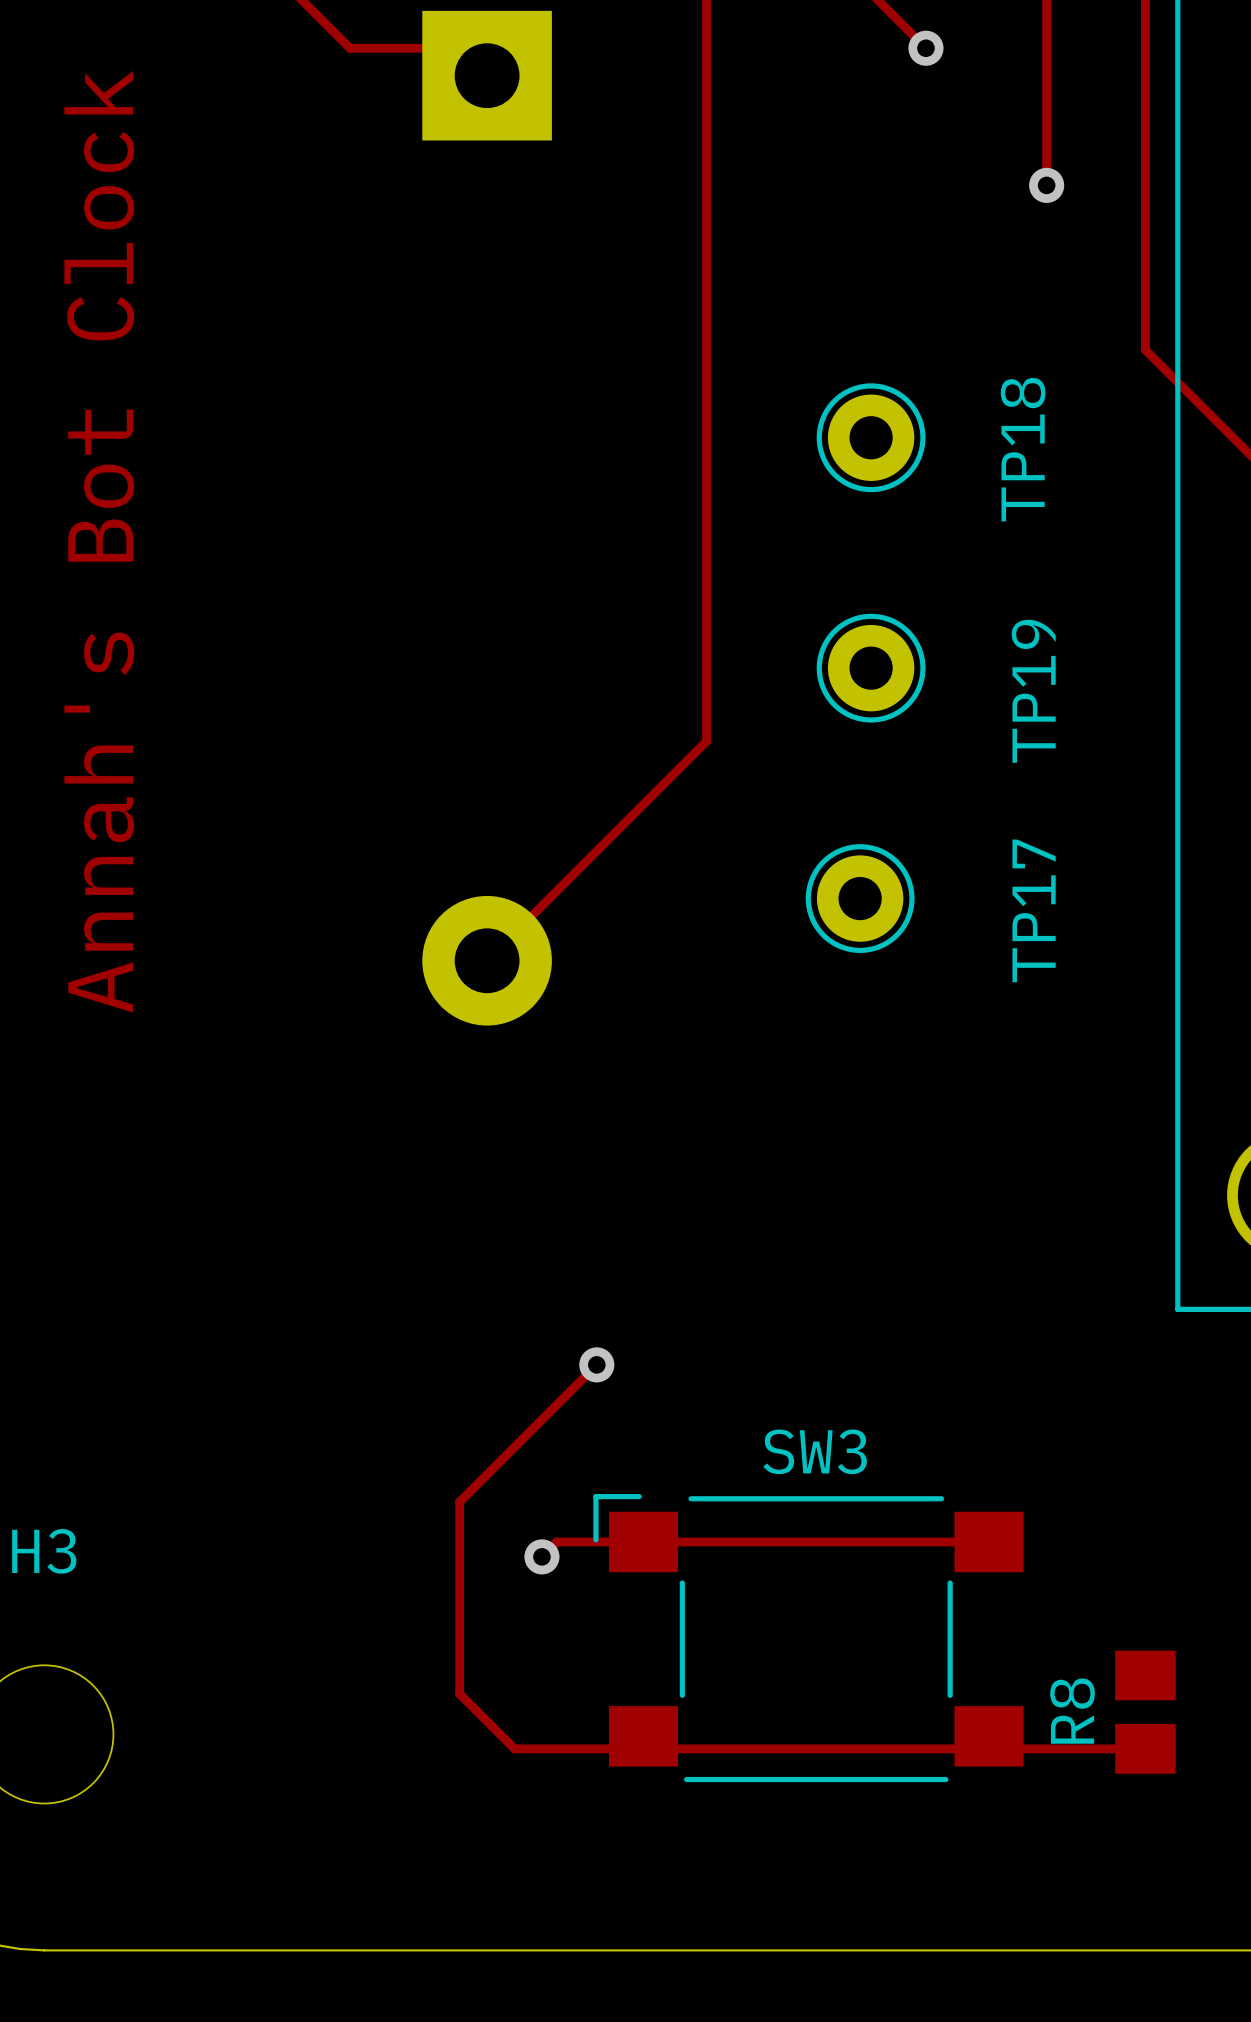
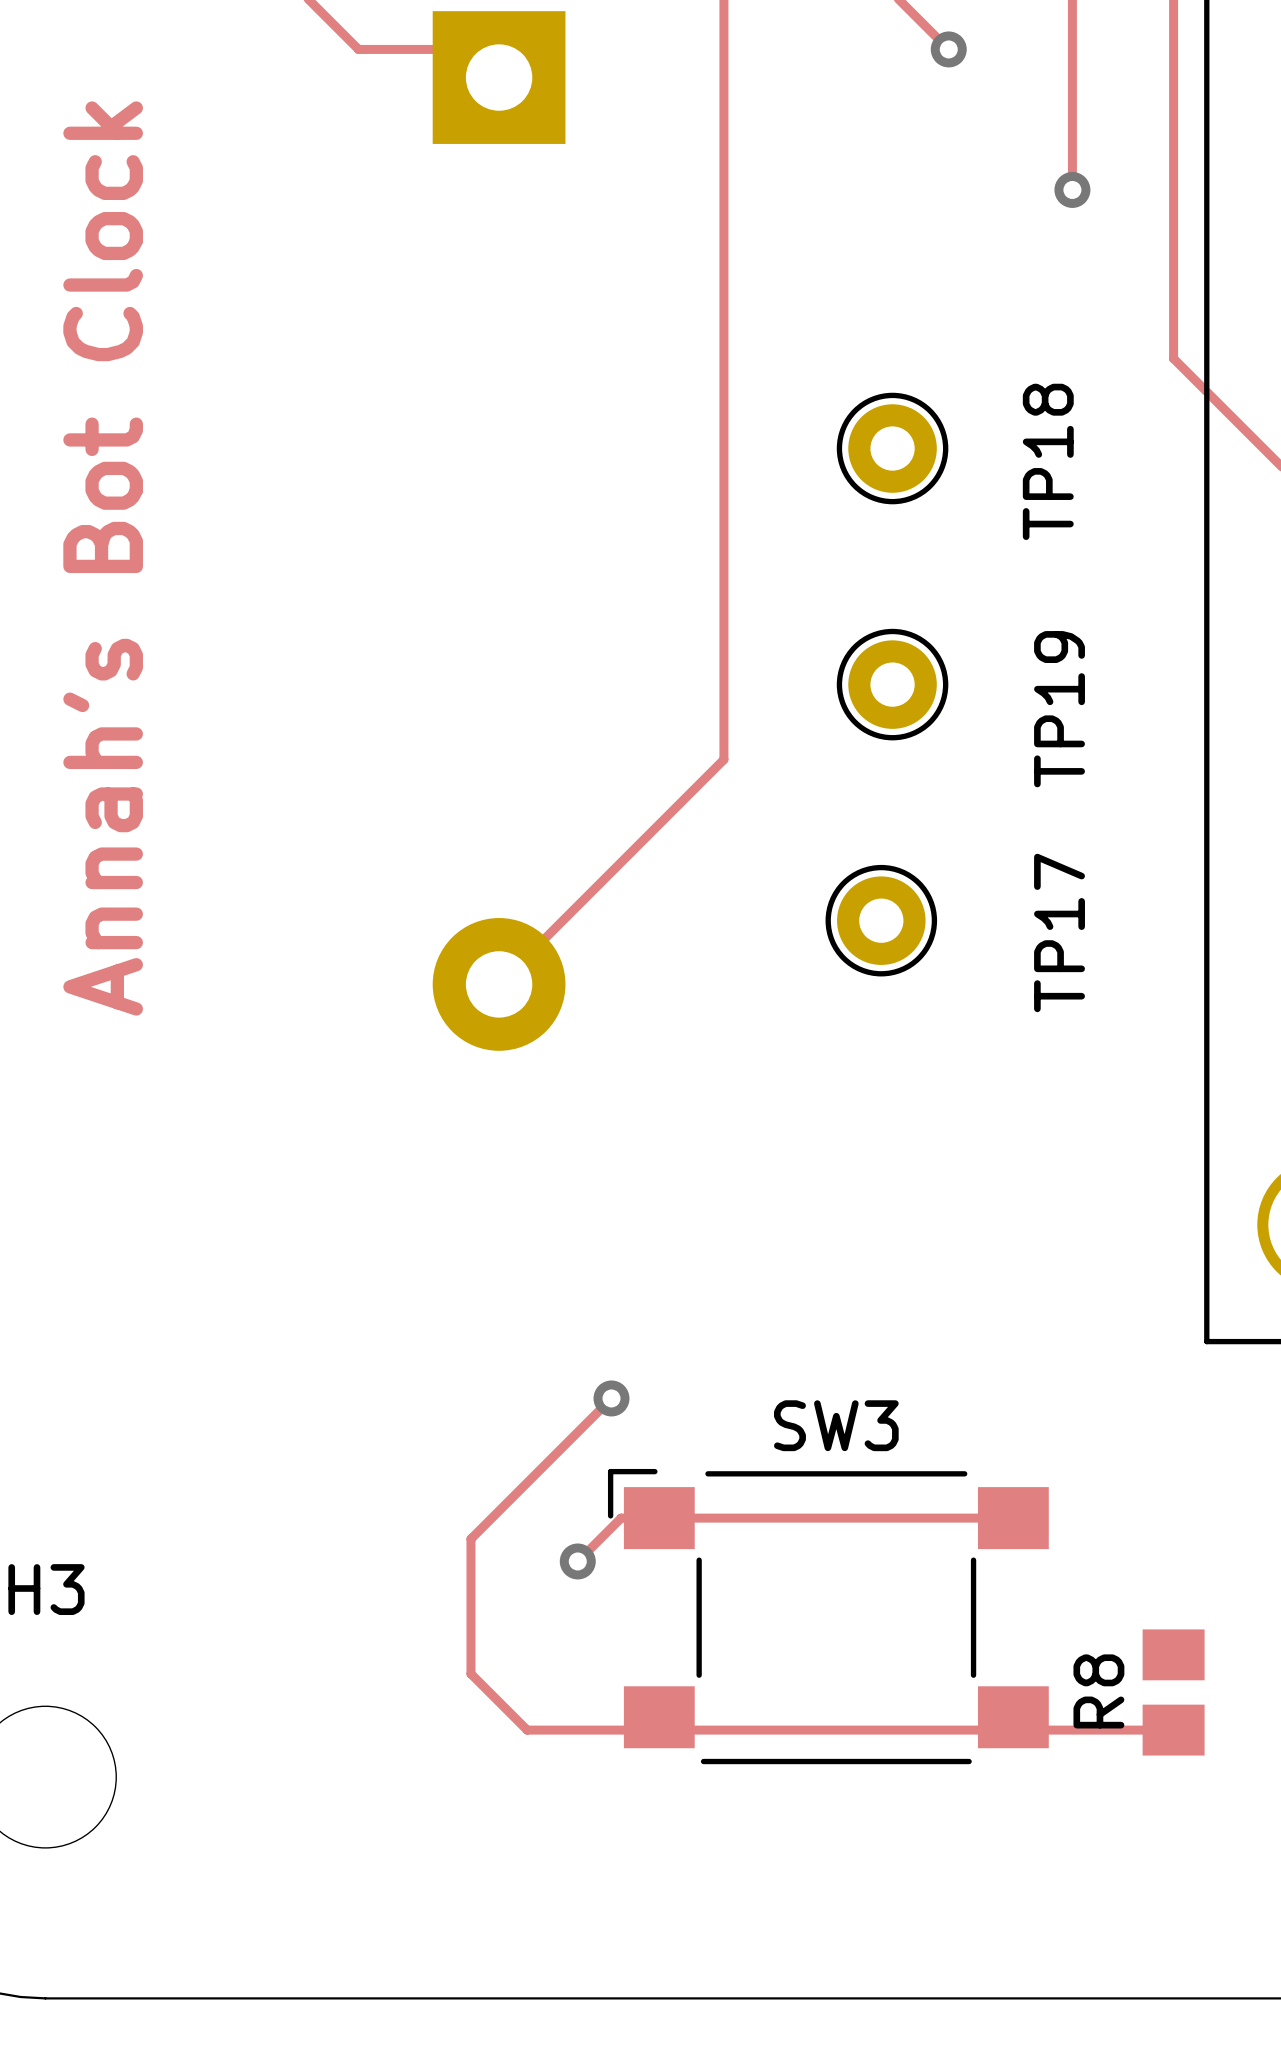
track: none -> (1013, 1518) (621, 1518) (577, 1561)
track: (989, 1541) (556, 1541) (541, 1556) -> none
via position: (541, 1556) -> (577, 1561)
track: (459, 1633) (459, 1694) (514, 1748) (1145, 1748) -> (470, 1673) (527, 1730) (1173, 1730)
SW3 position: (808, 1638) -> (828, 1616)
R8 position: (1145, 1712) -> (1173, 1692)

